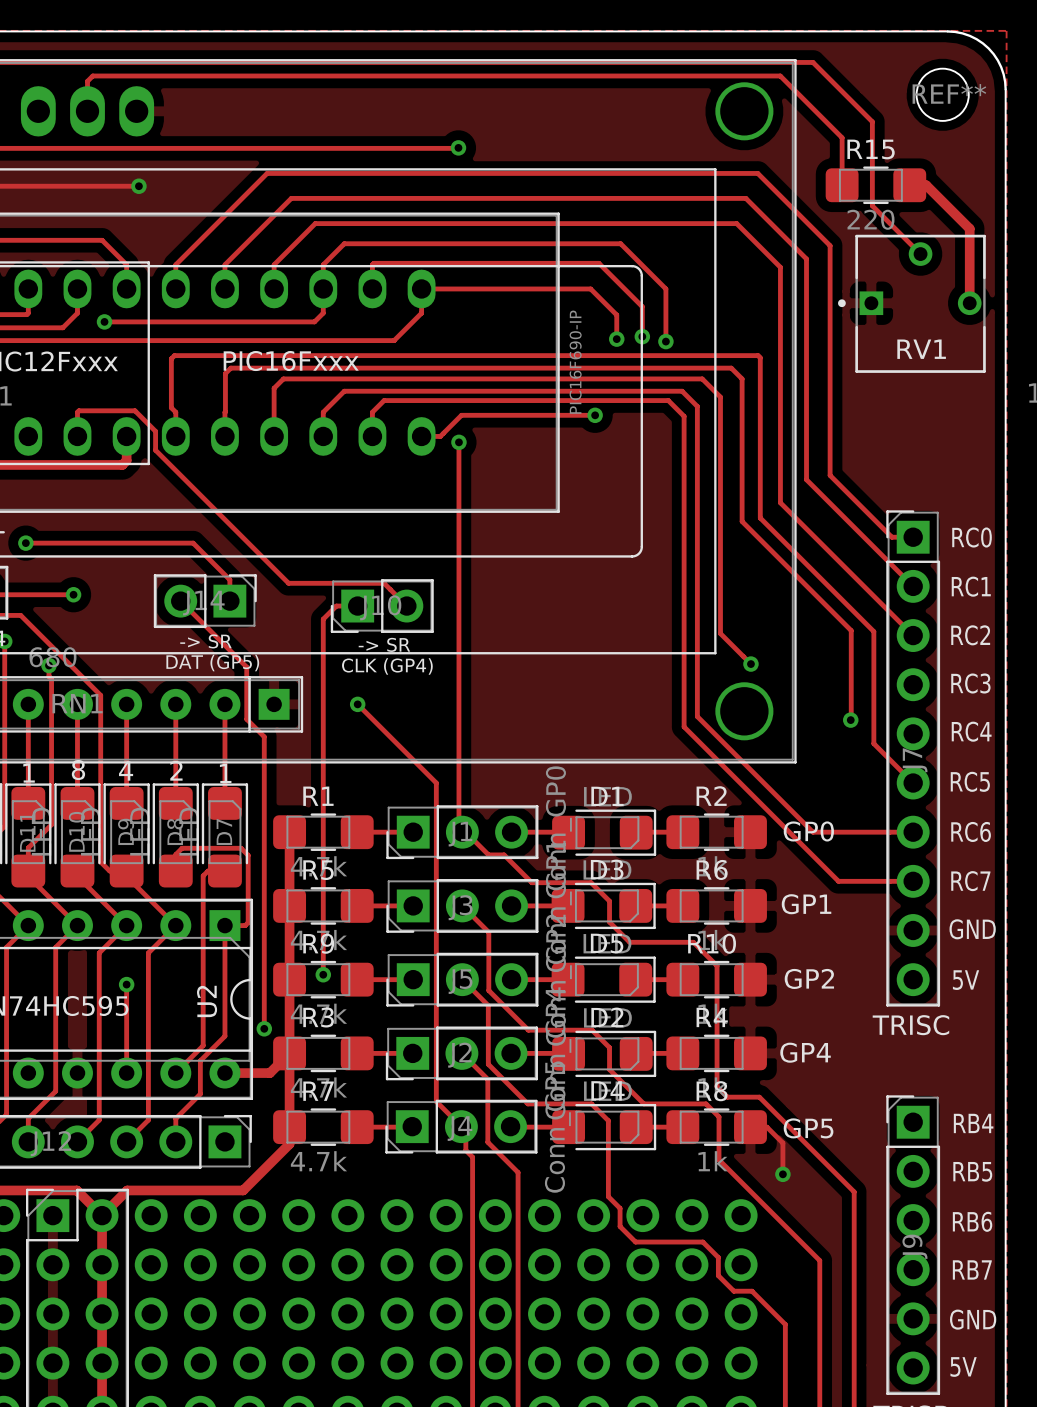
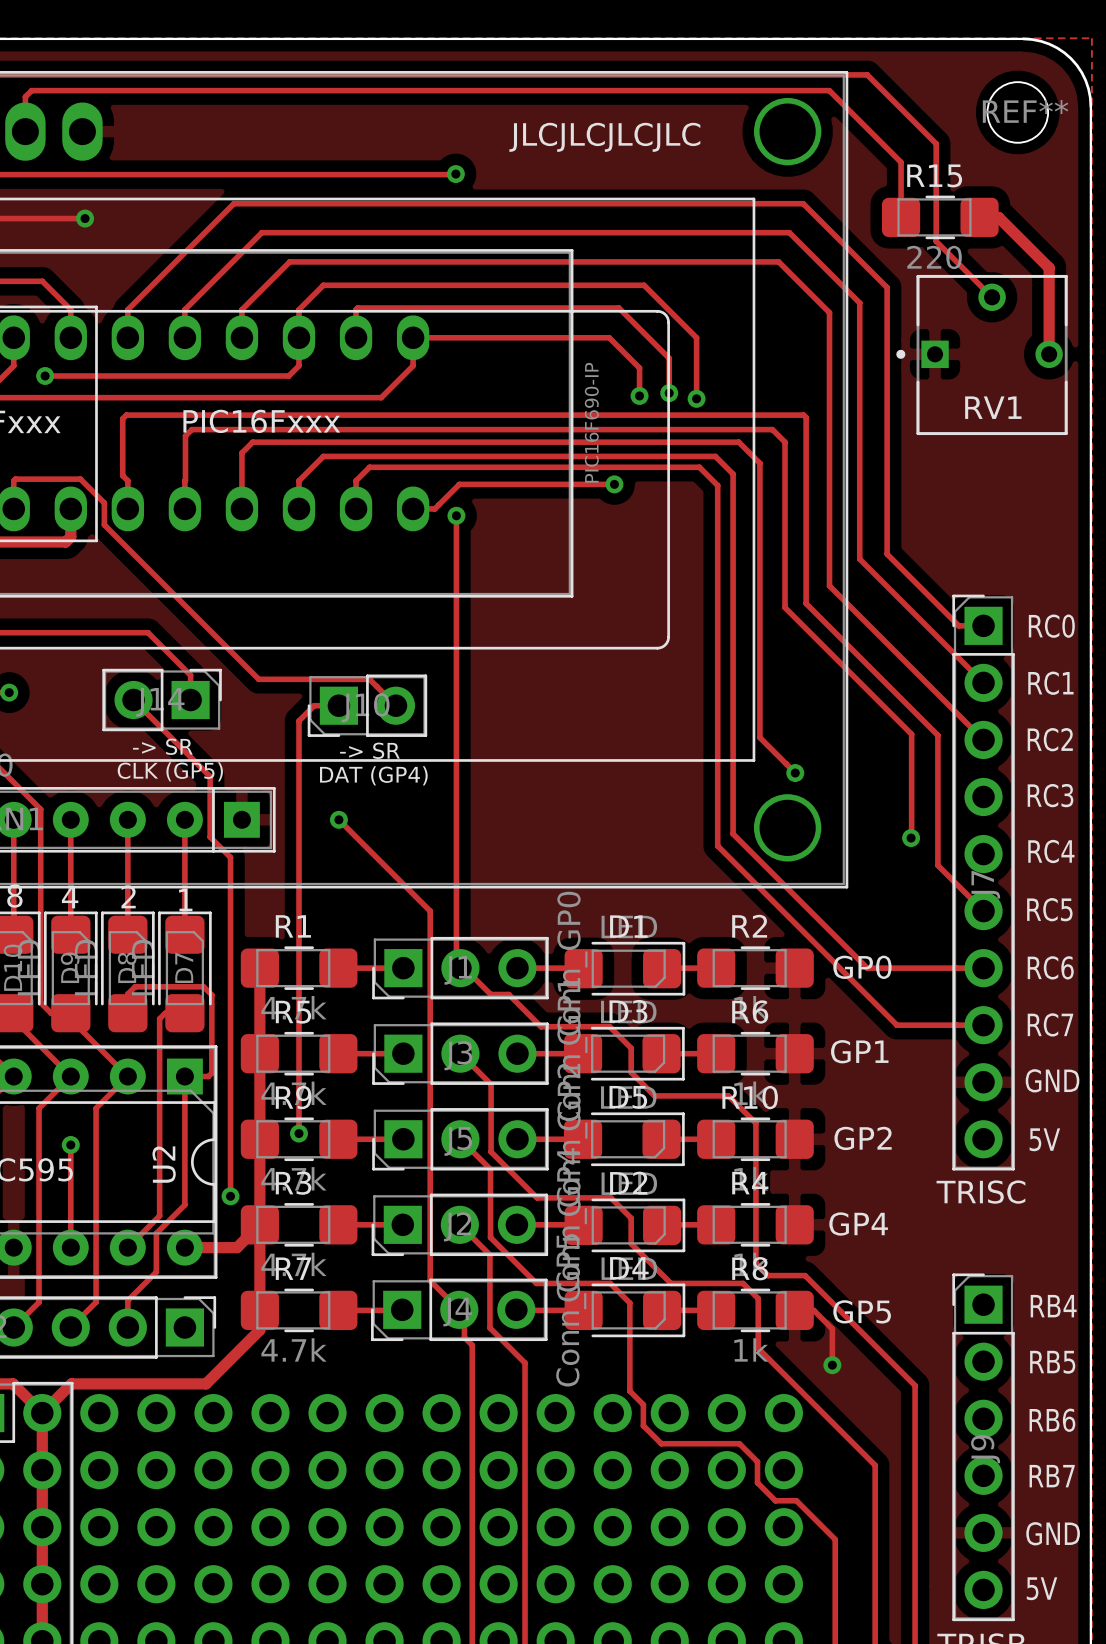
text: none -> JLCJLCJLCJLC (604, 137)
text: DAT (GP5) (212, 663) -> CLK (GP5) (170, 771)
text: CLK (GP4) (387, 666) -> DAT (GP4) (373, 775)

